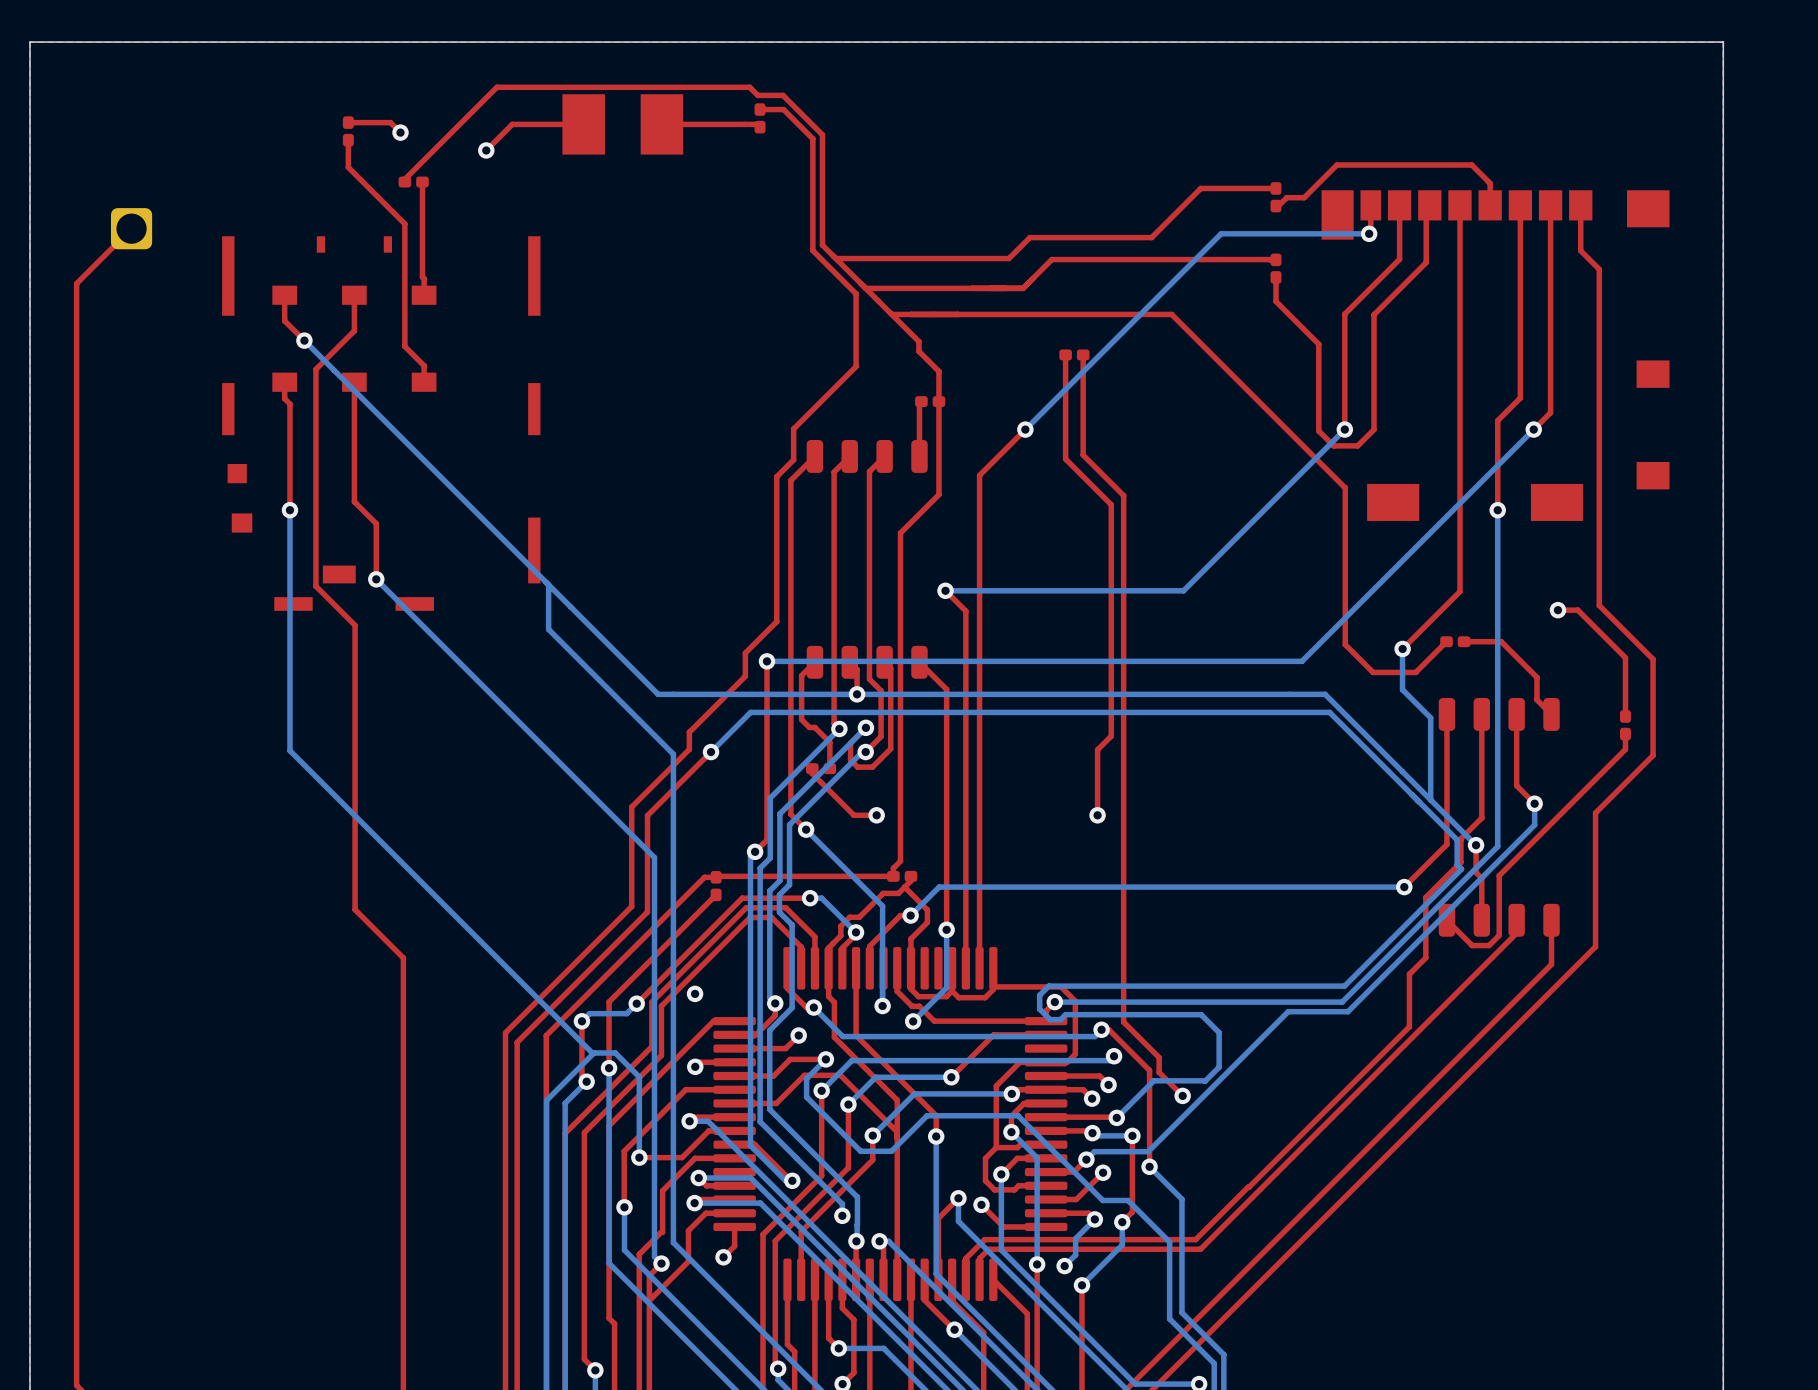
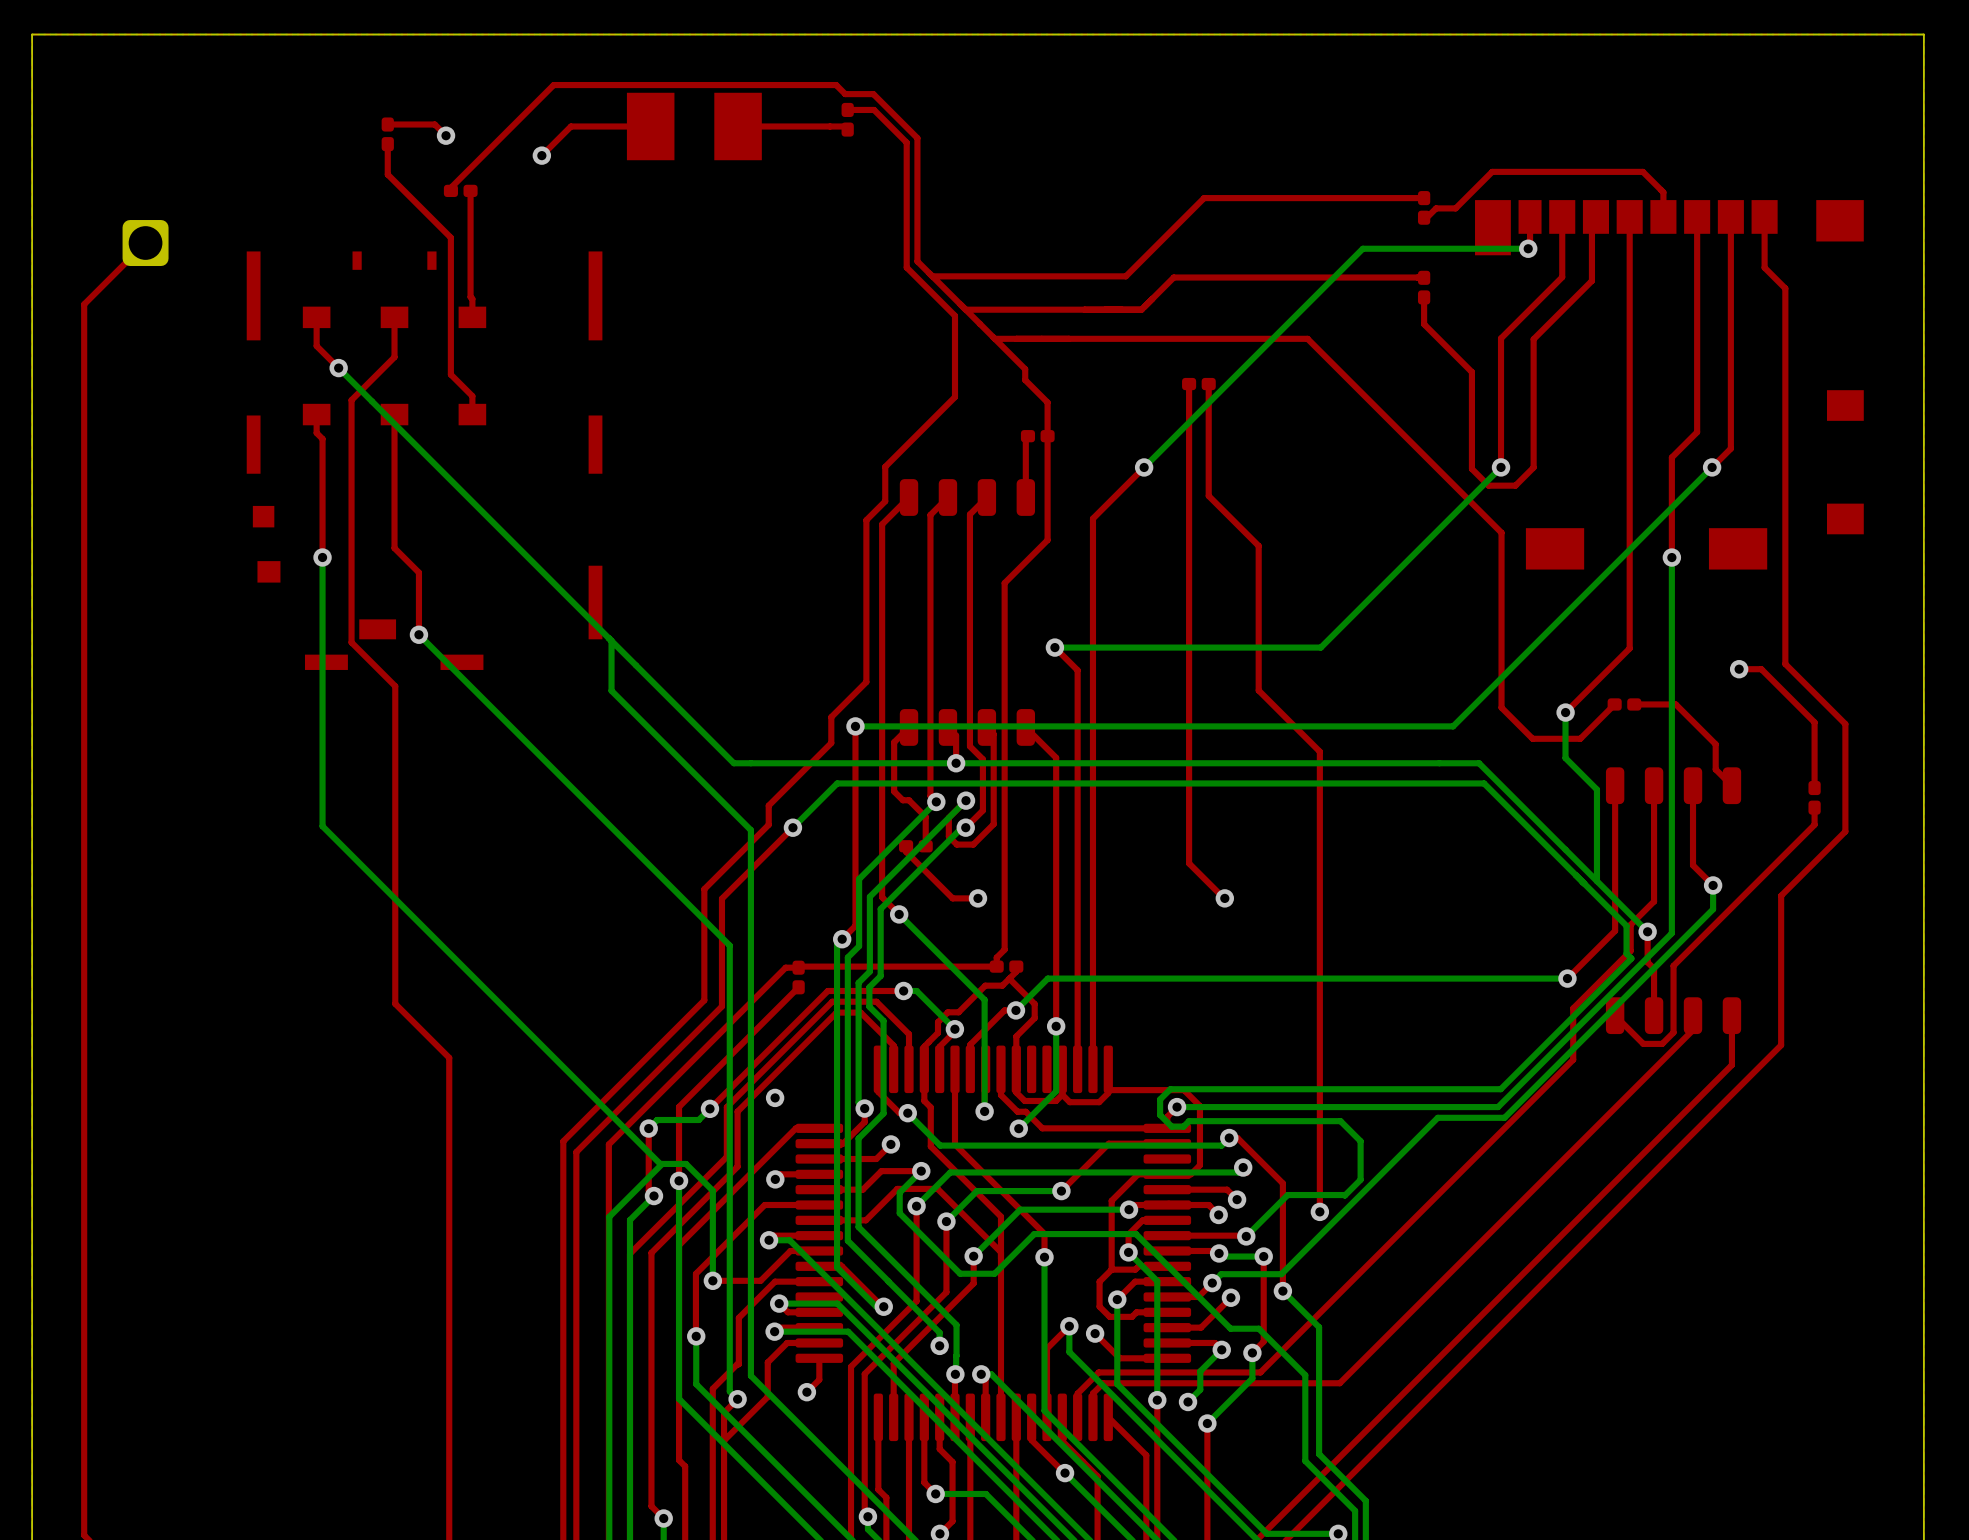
top track: (1200, 188) (1151, 237) (1029, 237) -> (1340, 198) (1204, 198) (1149, 252)
top track: (1065, 459) (1111, 504) (1111, 736) (1097, 749) (1097, 815) -> (1189, 500) (1189, 863) (1227, 902)
top track: (1123, 495) (1123, 1022) (1159, 1057) (1159, 1072) (1182, 1095) -> (1253, 541) (1258, 545) (1258, 690) (1319, 751) (1319, 1211)
top track: (1425, 897) (1425, 957) (1409, 974) (1409, 1026) (1195, 1239) (1129, 1239) -> (1591, 990) (1573, 1008) (1573, 1059) (1260, 1372)

